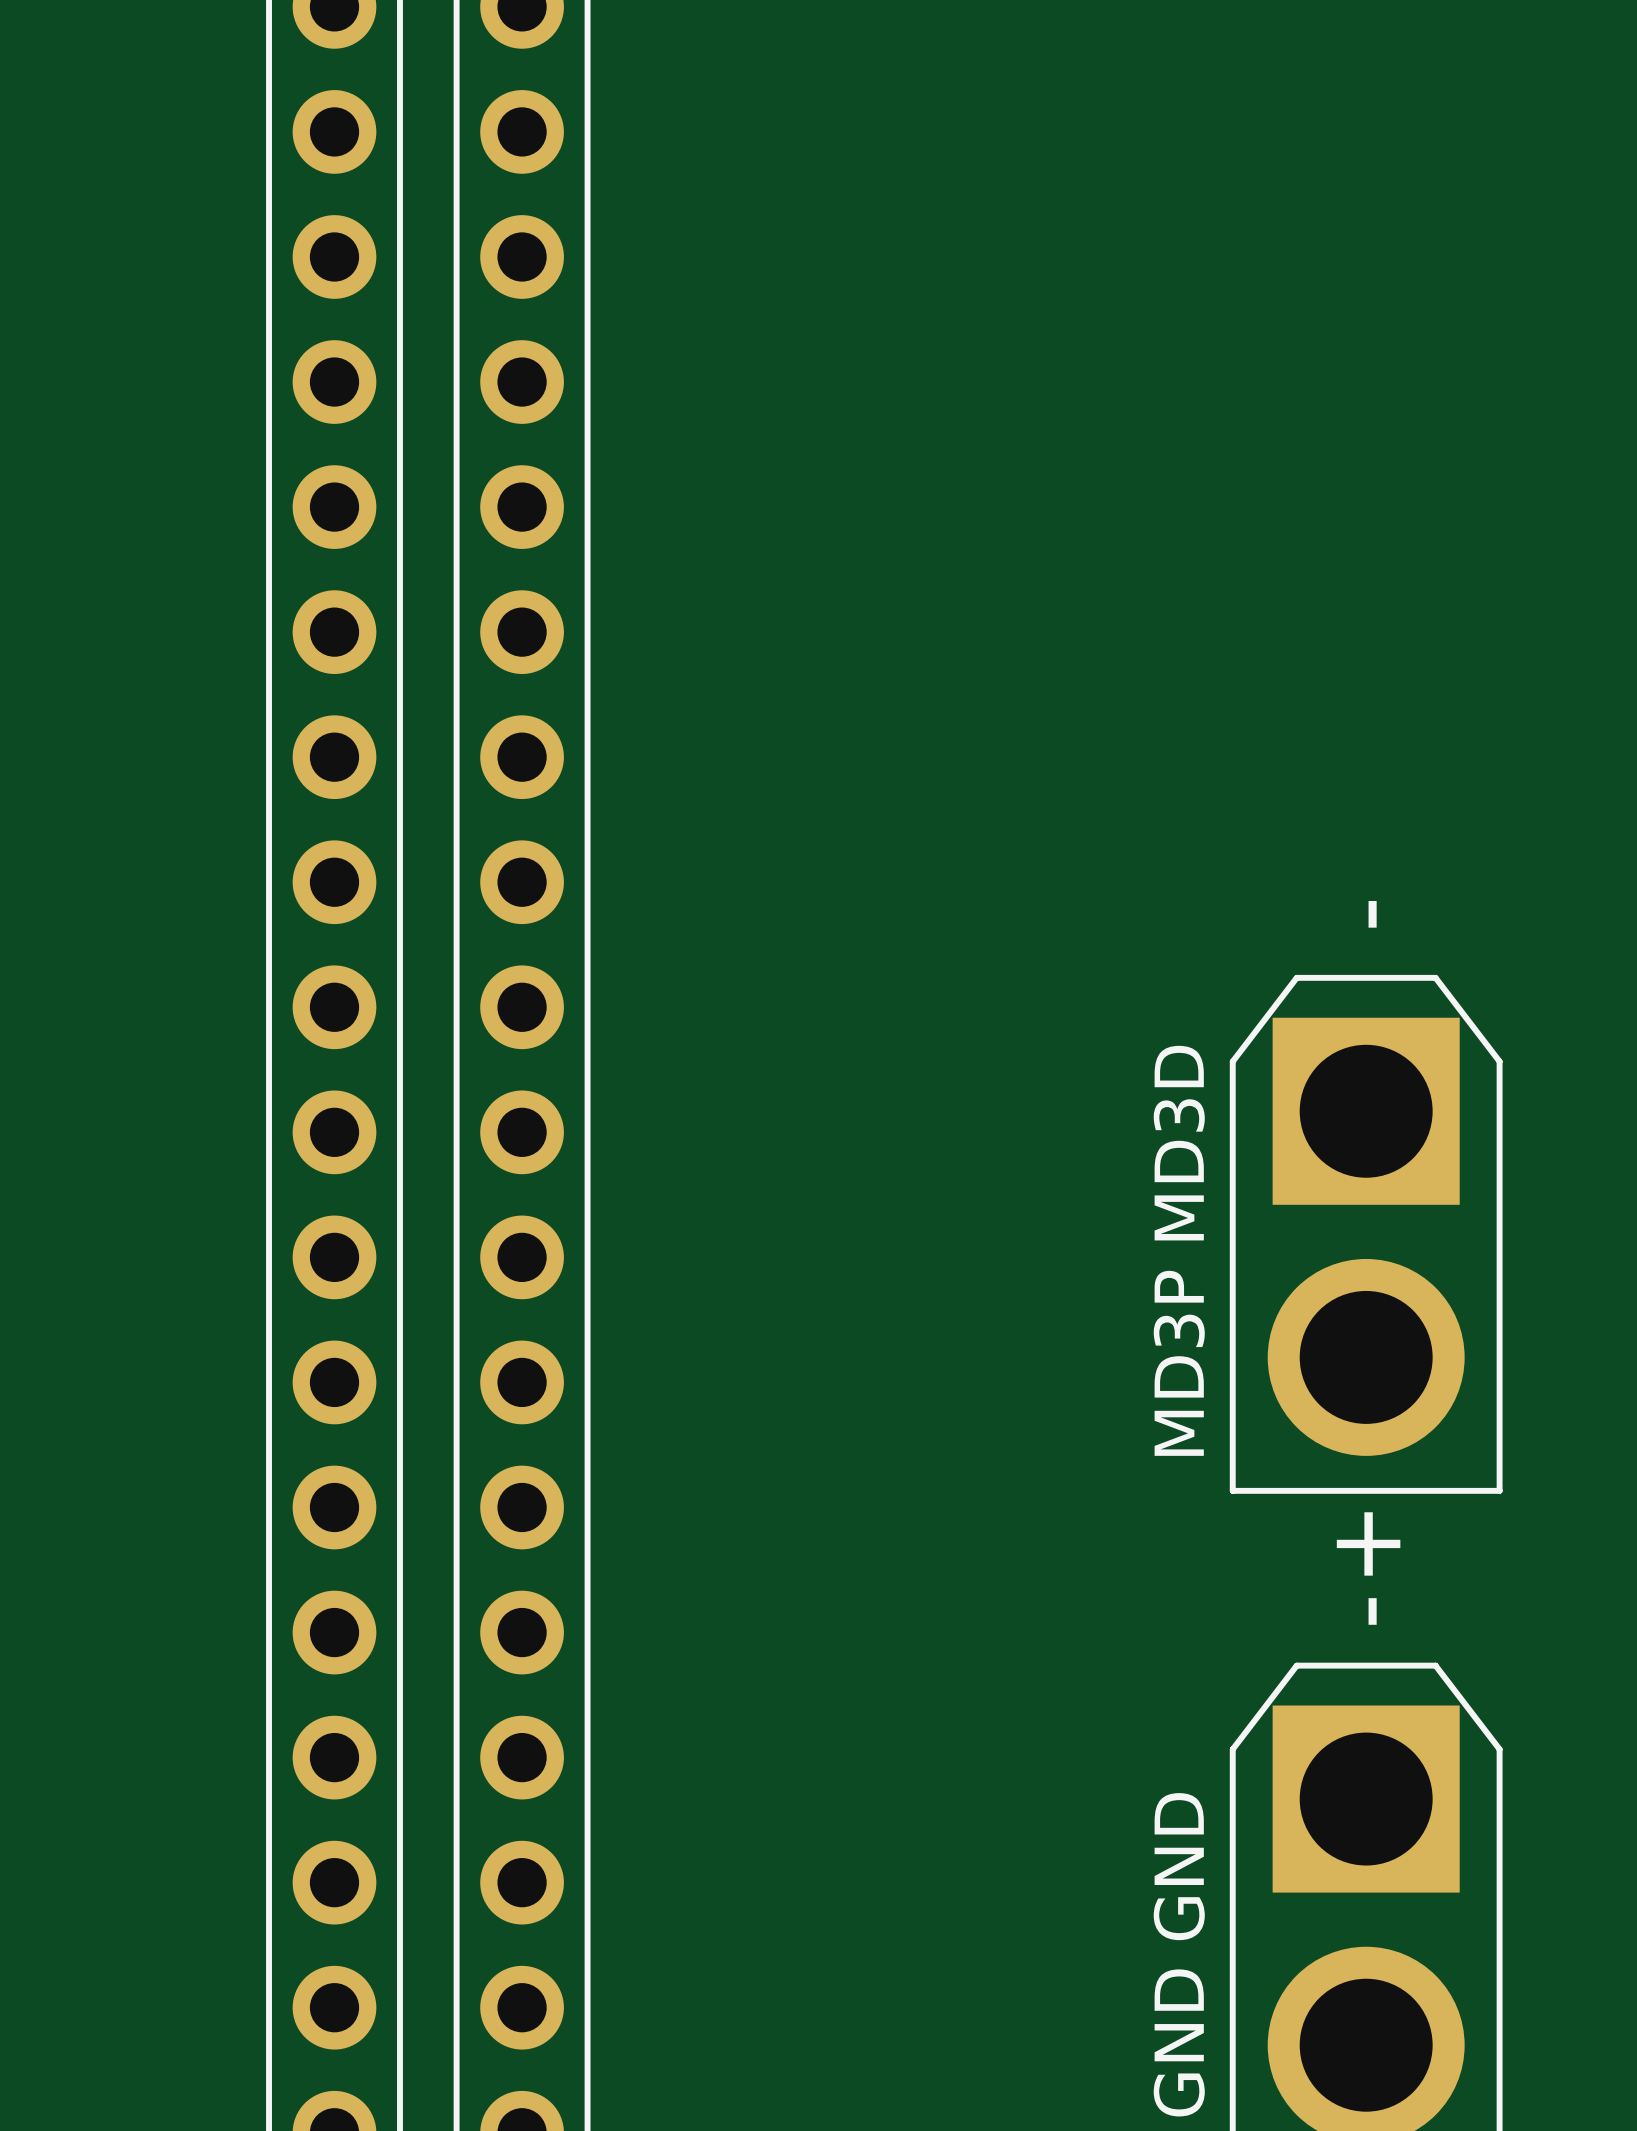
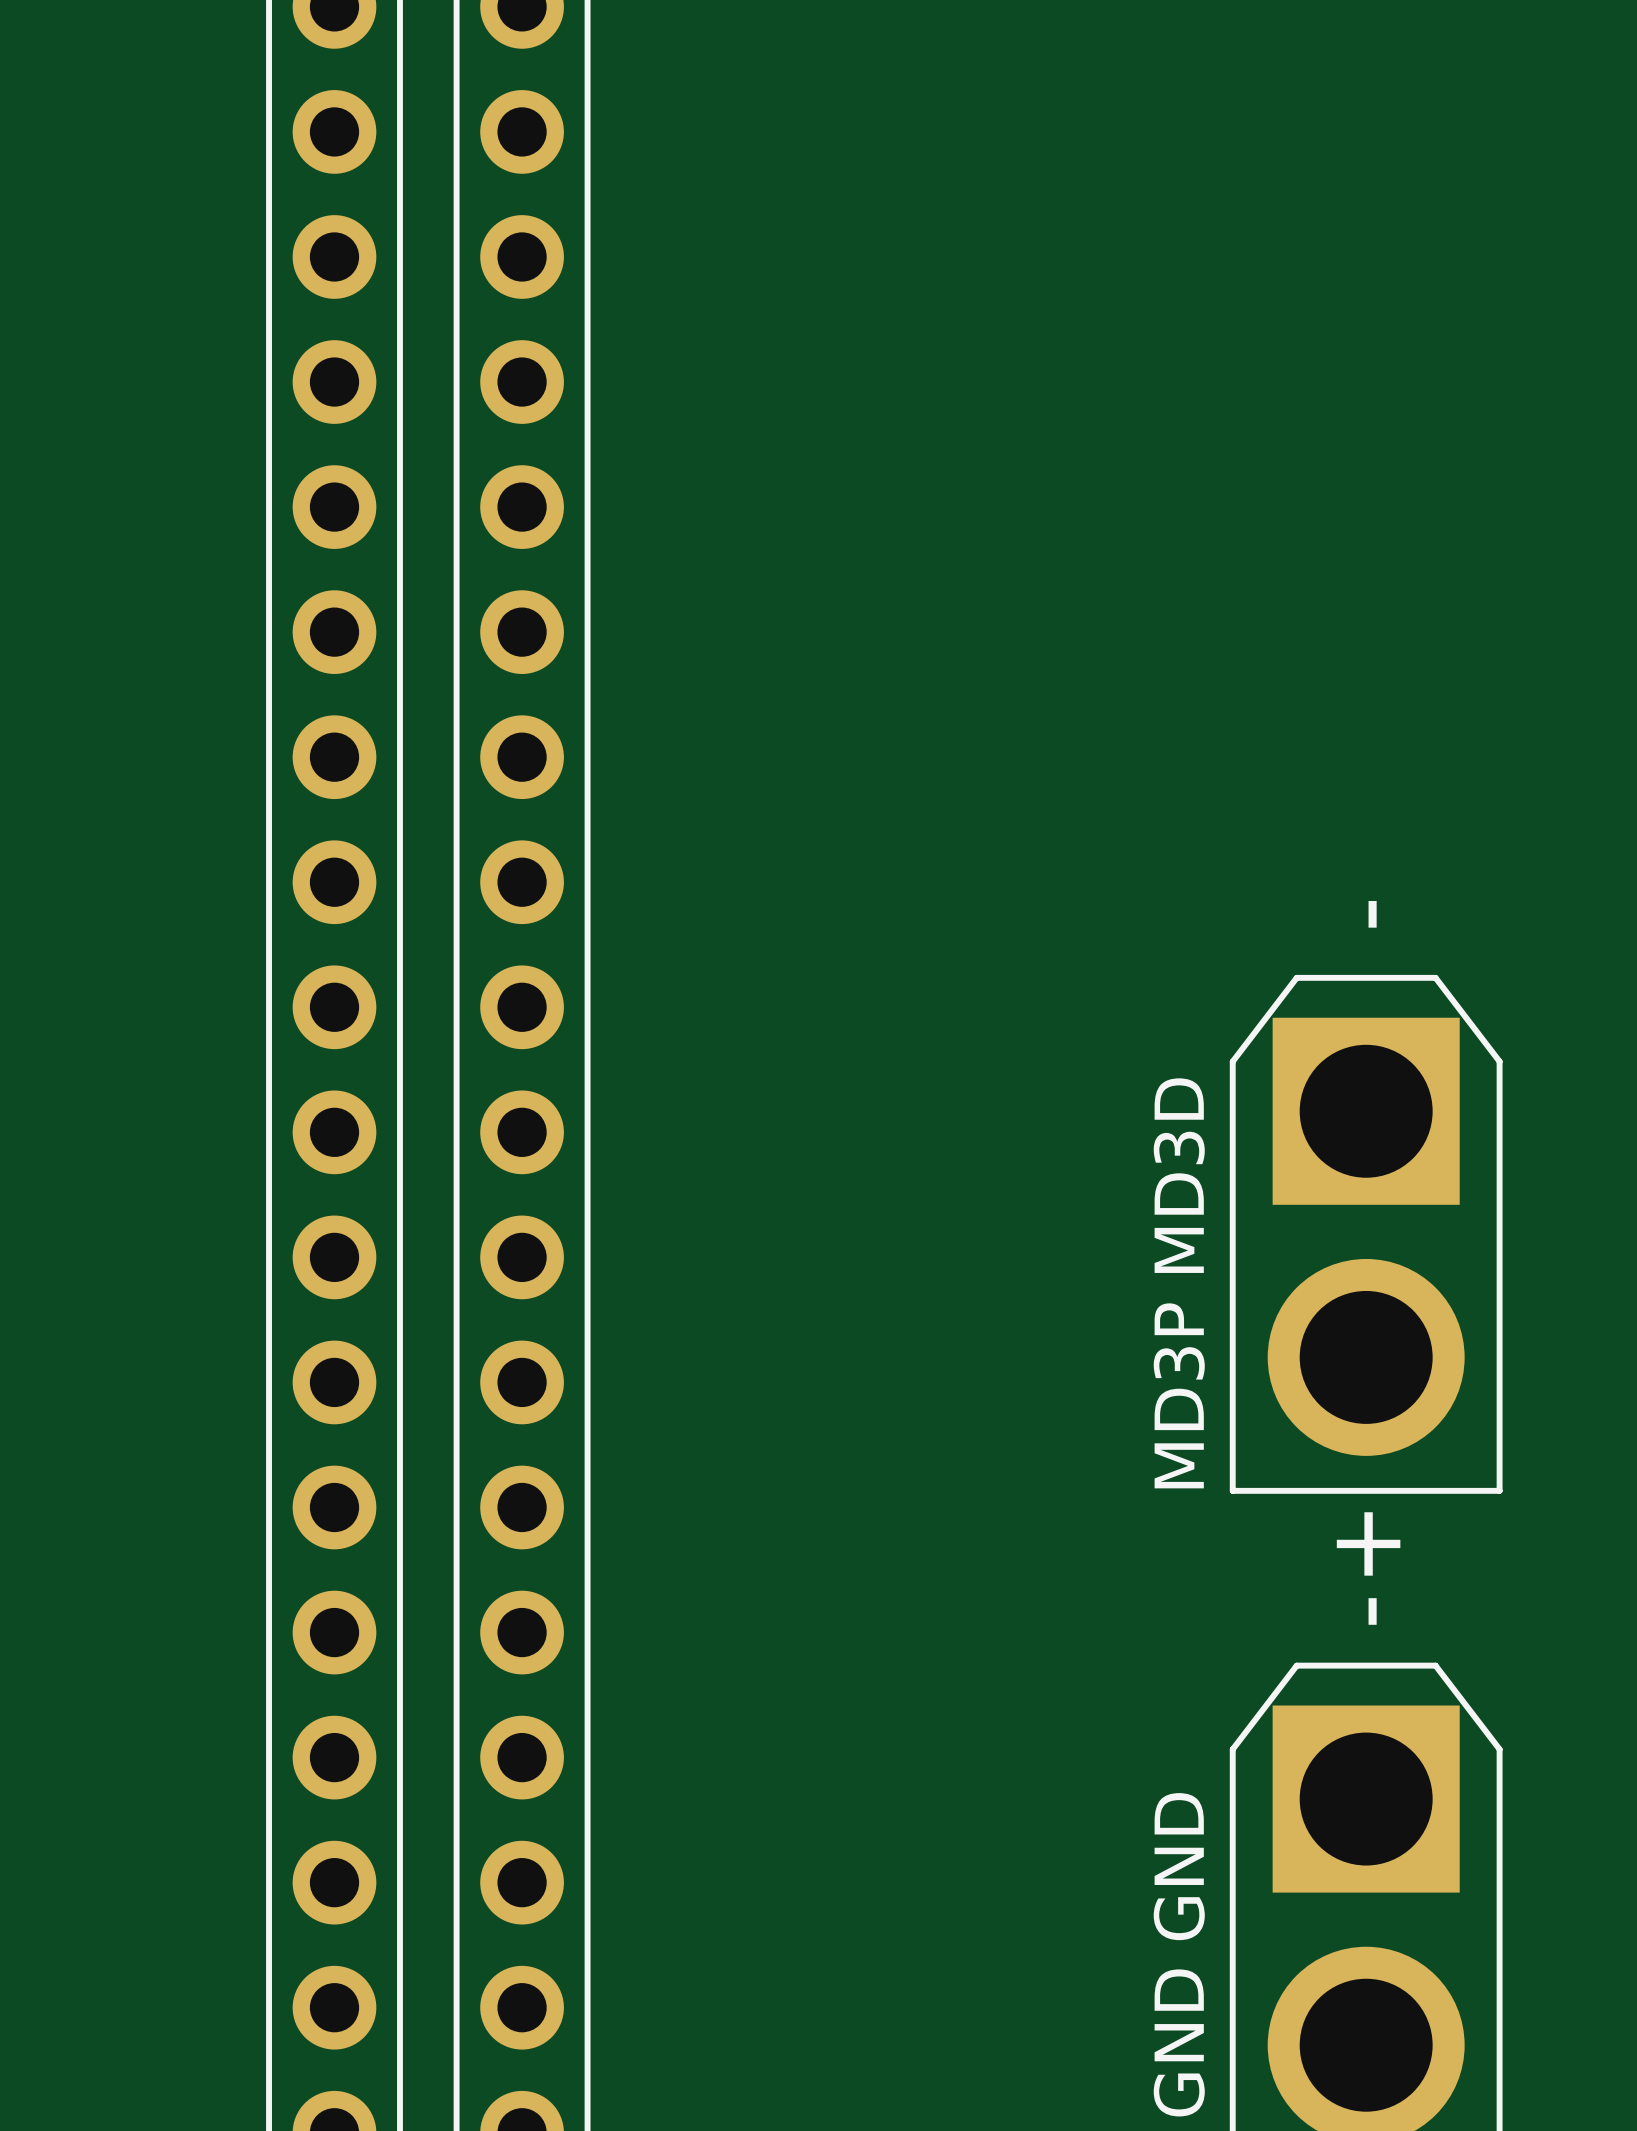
text position: MD3P MD3D (1179, 1250) -> MD3P MD3D (1179, 1283)

